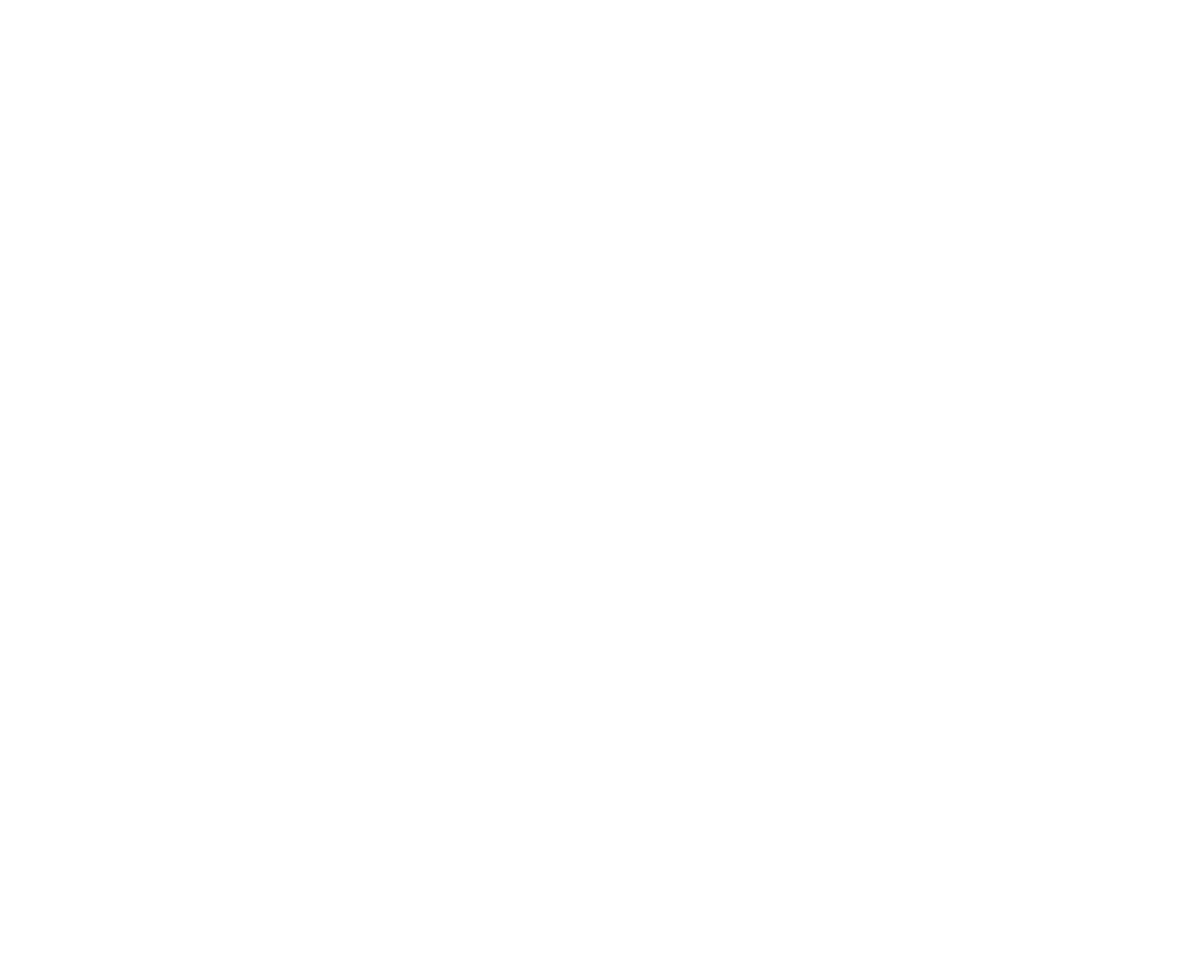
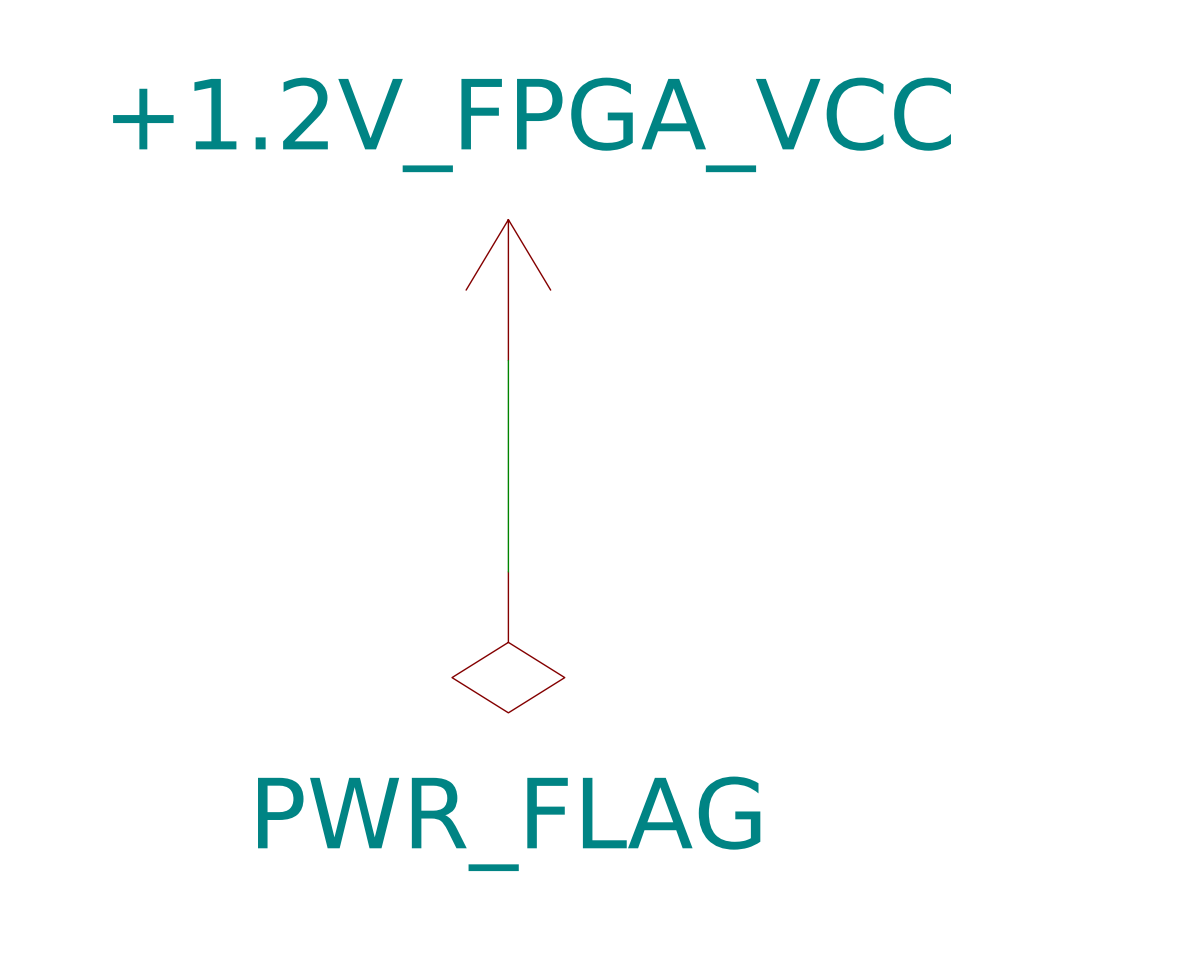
power symbol: none -> +1.2V_FPGA_VCC (508, 290)
wire: none -> (508, 360) (508, 571)
power symbol: none -> PWR_FLAG (508, 642)

